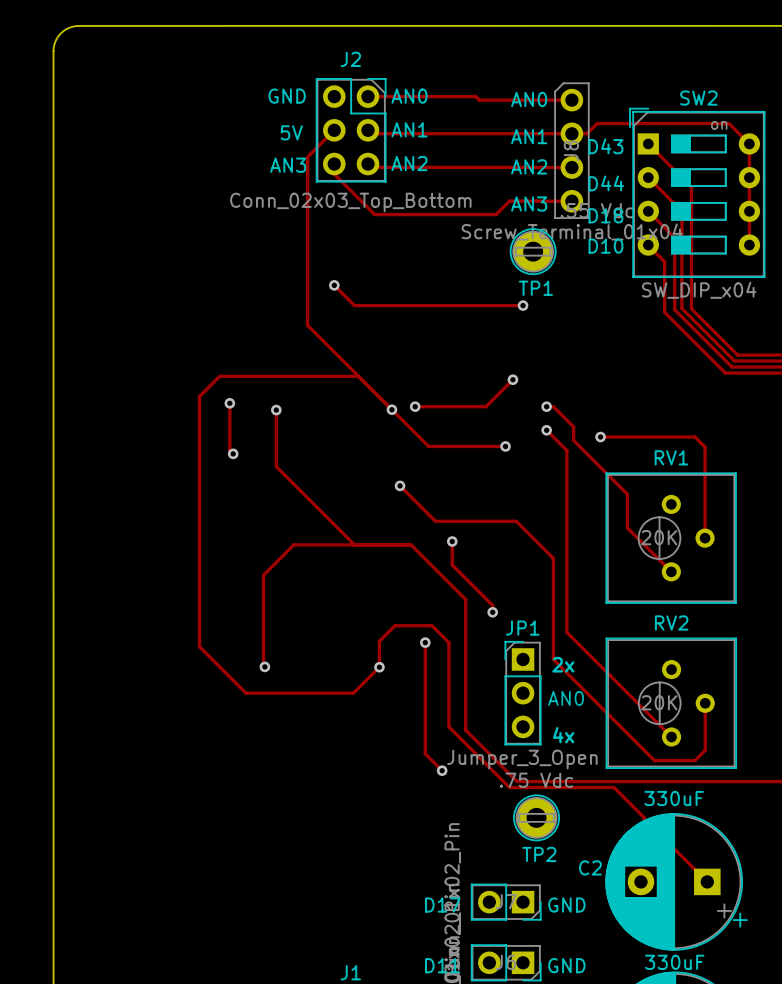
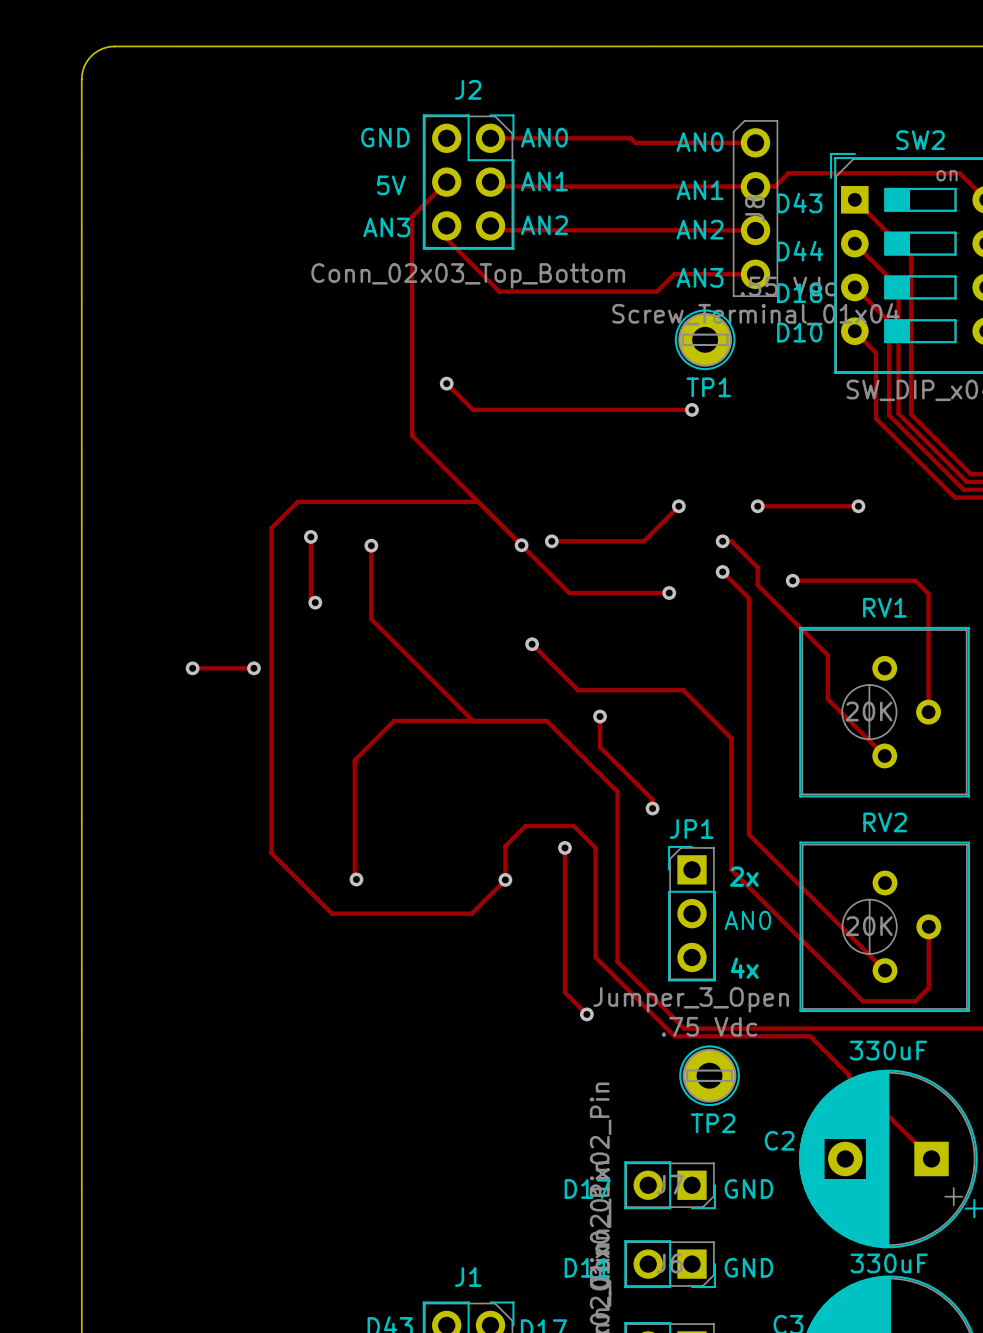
track: none -> (757, 506) (858, 506)
via: none -> (757, 506)
via: none -> (858, 506)
track: none -> (192, 668) (253, 668)
via: none -> (192, 668)
via: none -> (253, 668)

